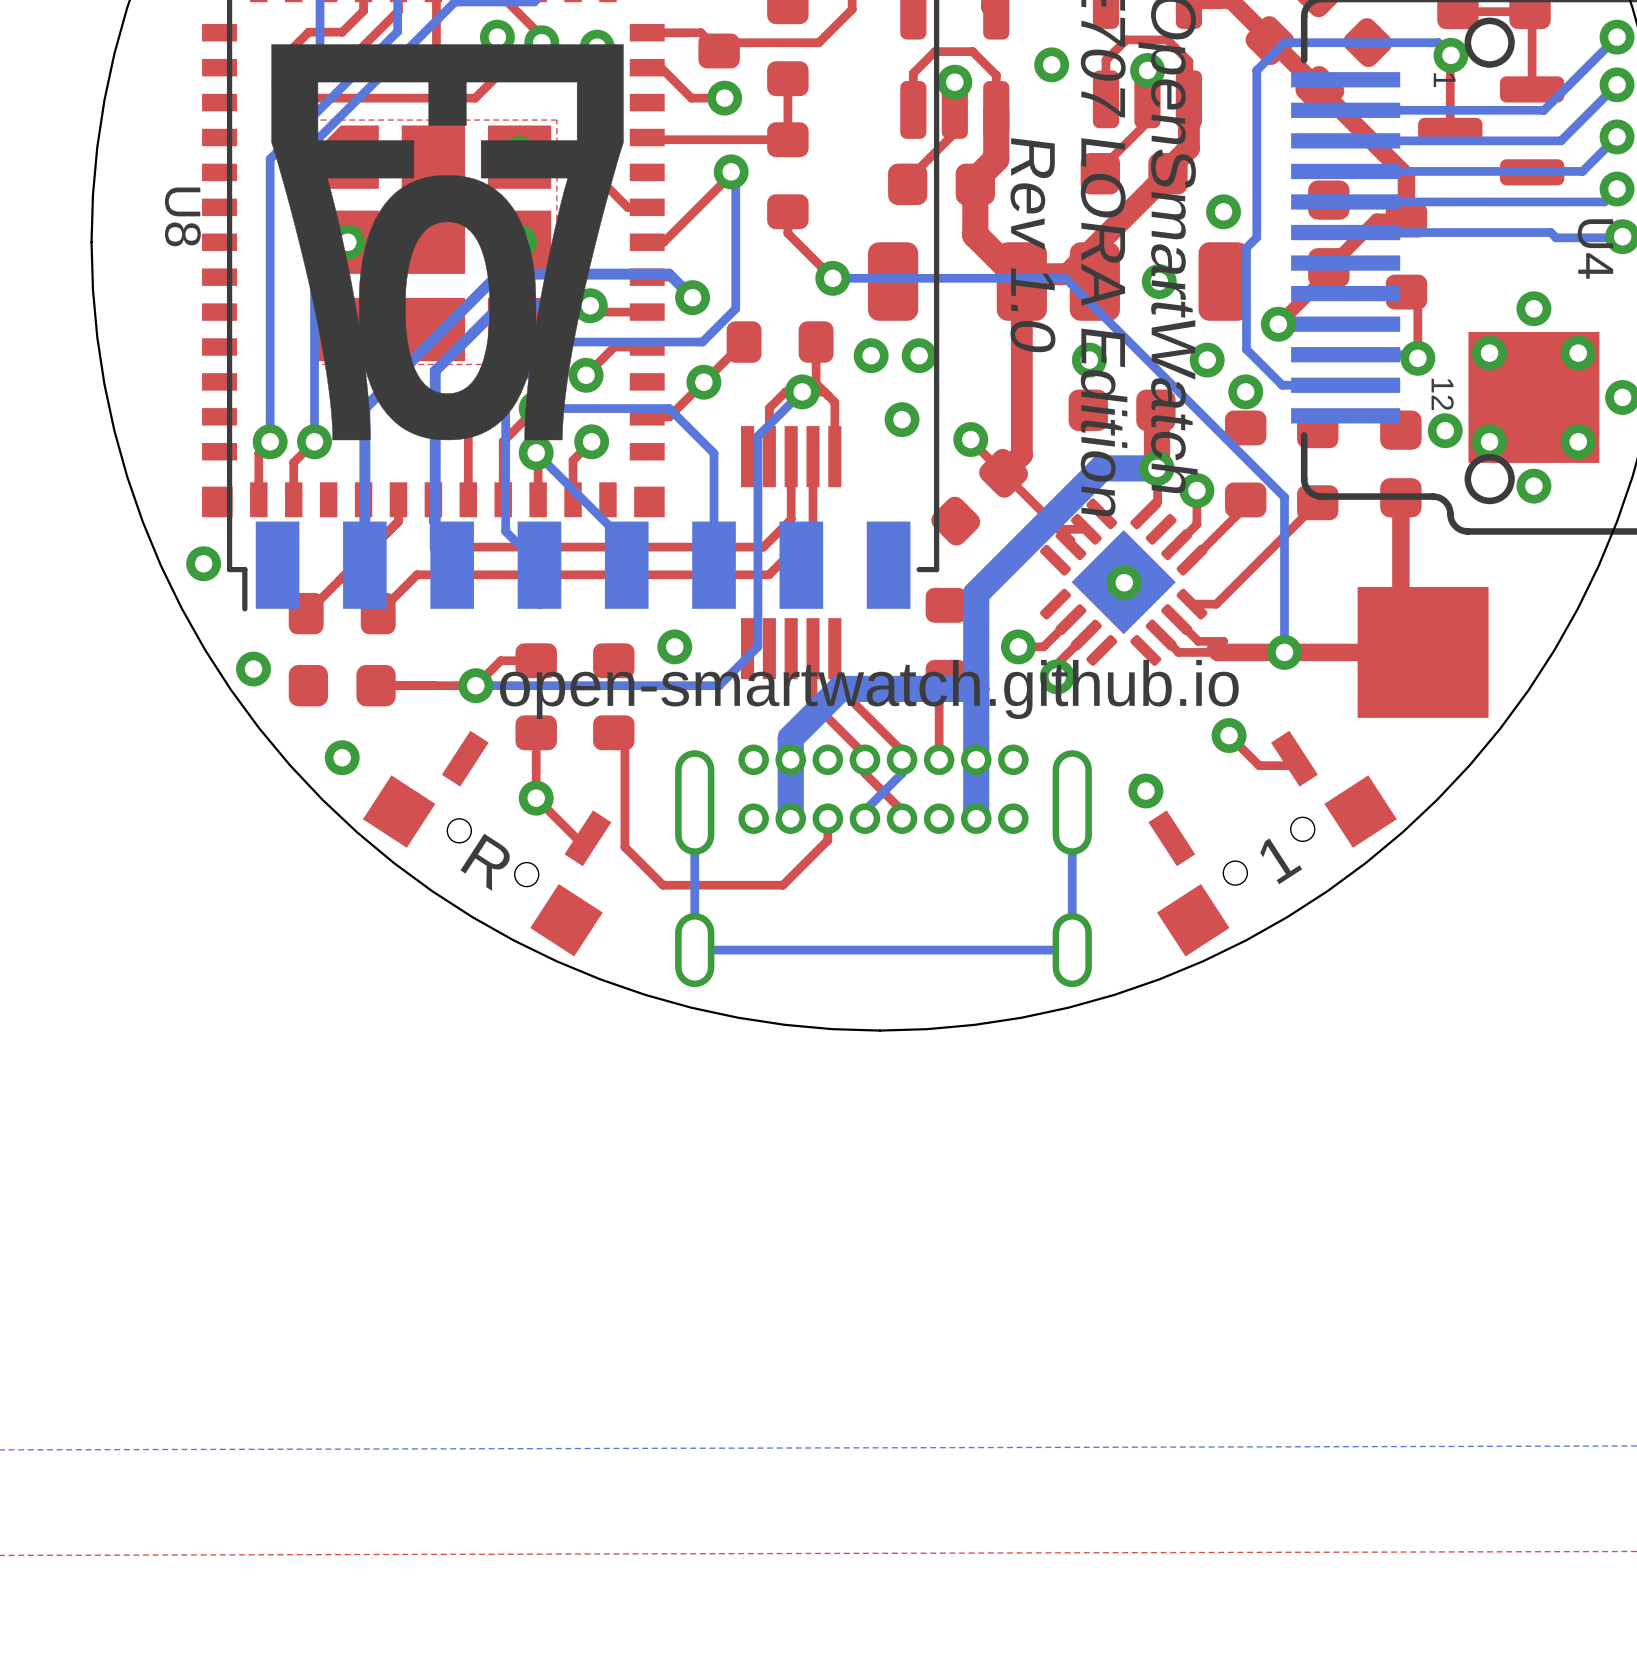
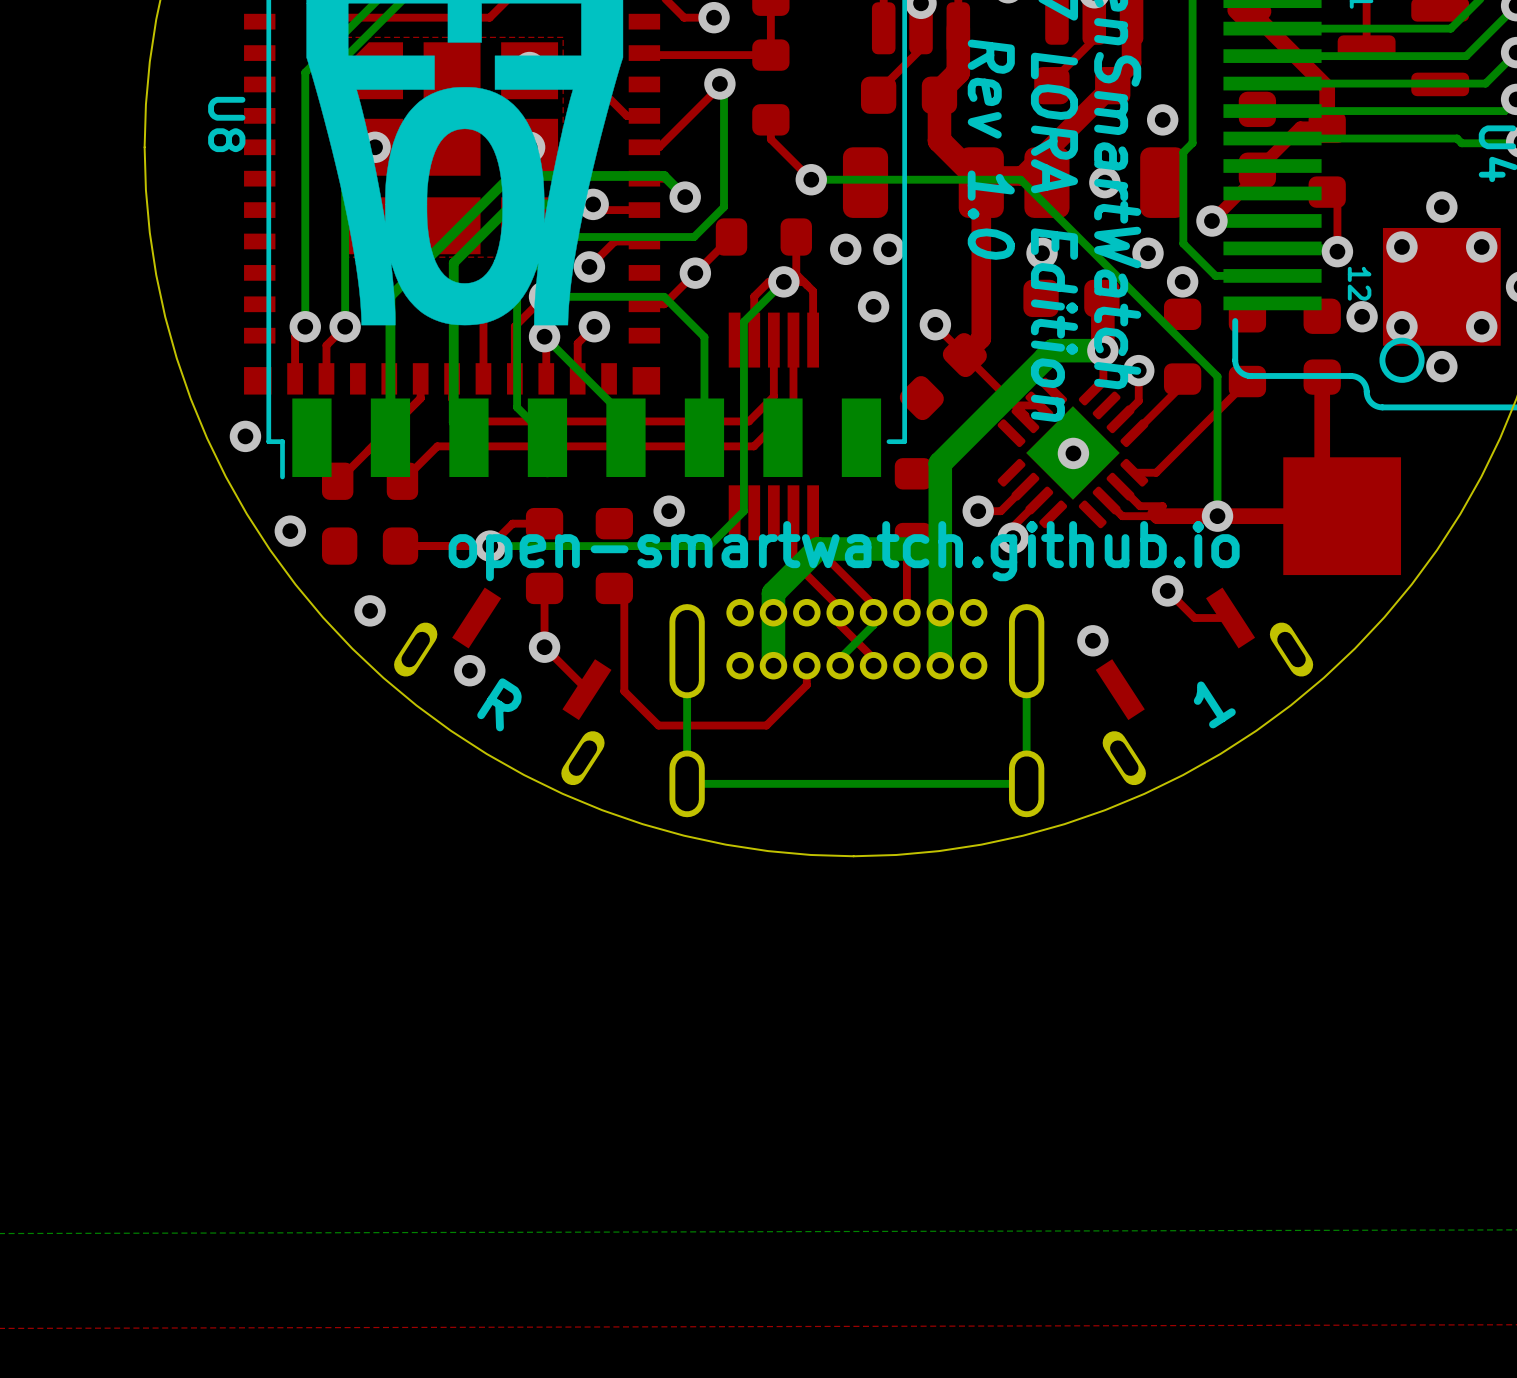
part footprint: [362, 730, 612, 957] -> [394, 587, 612, 786]
part footprint: [1148, 730, 1397, 957] -> [1095, 587, 1314, 786]
via: none -> (469, 670)

